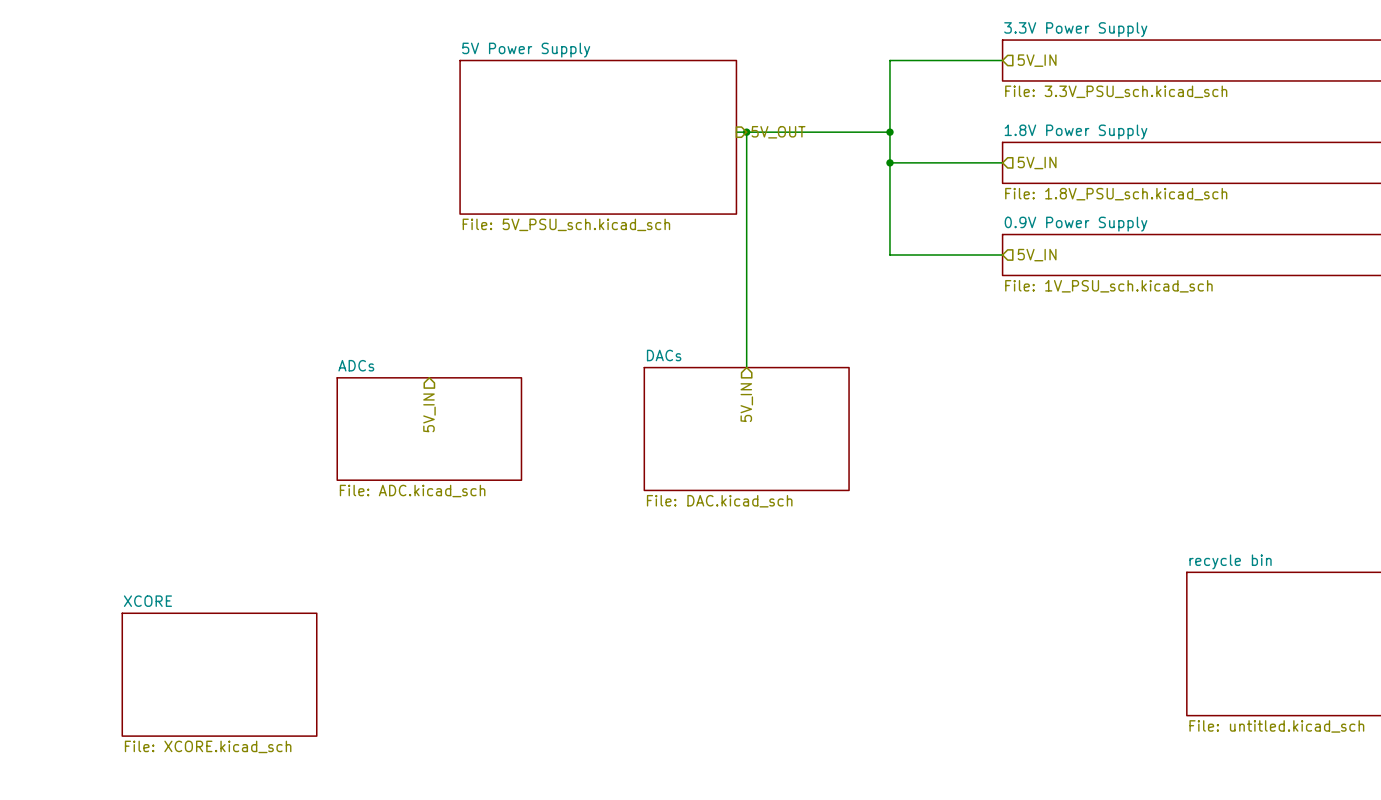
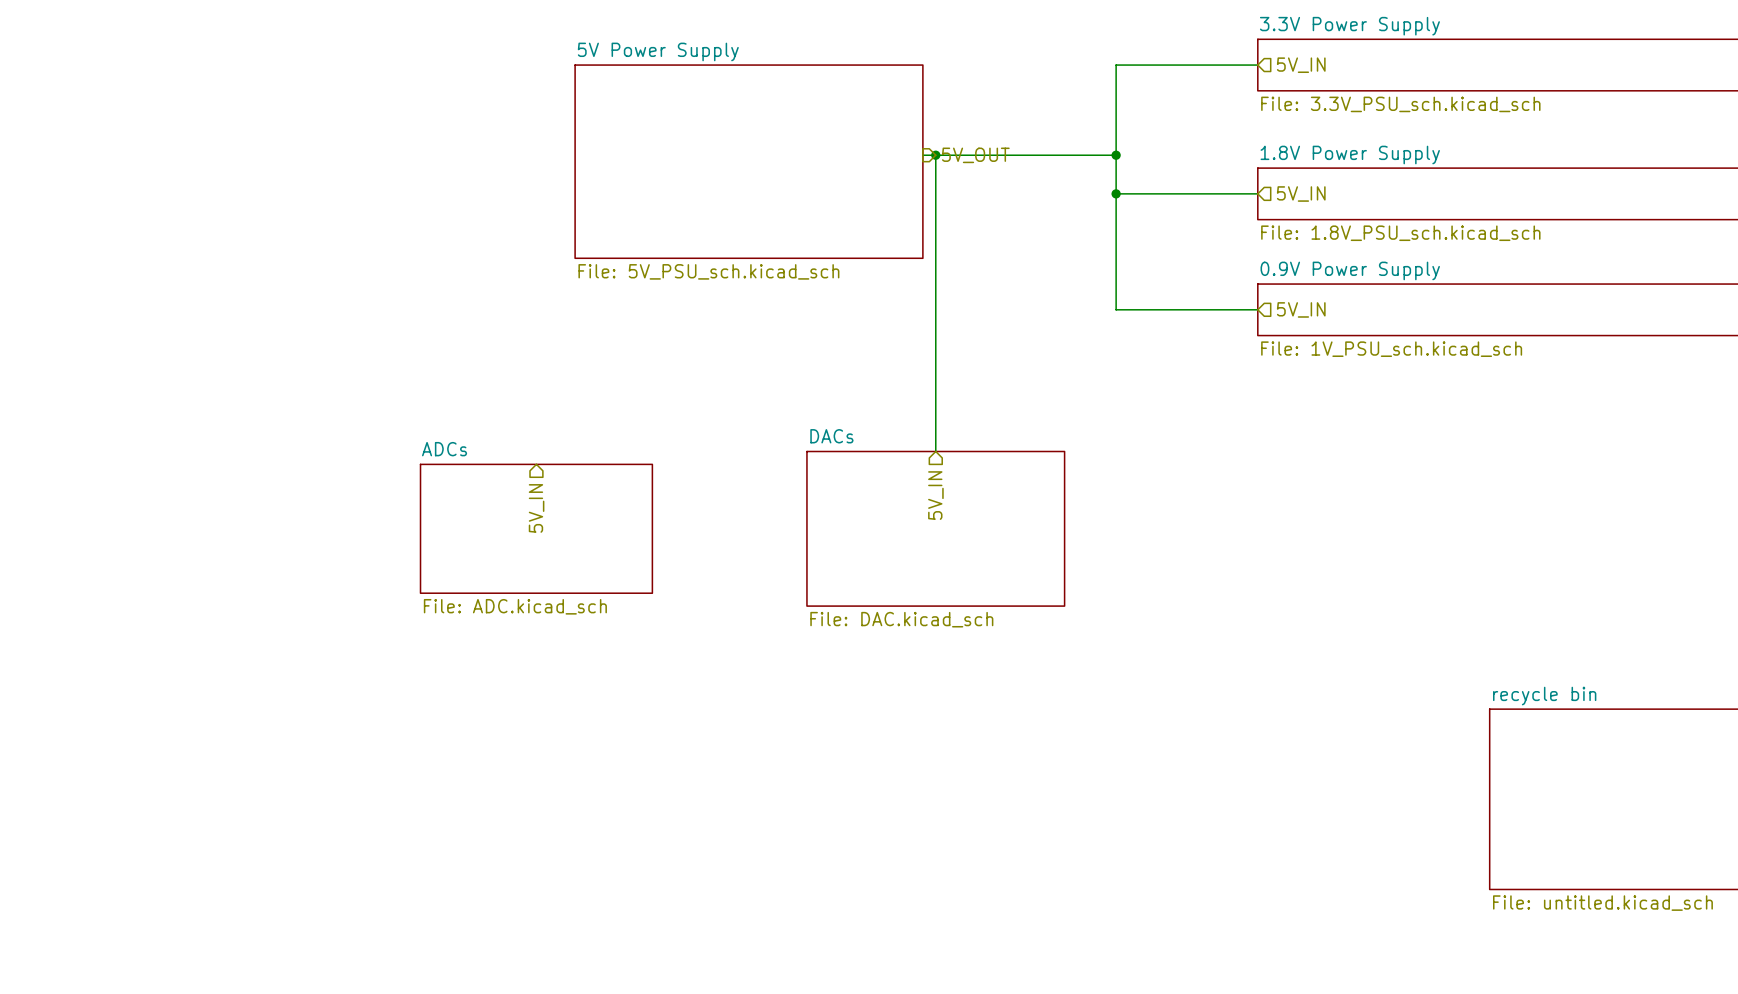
sheet XCORE: File: XCORE.kicad_sch (219, 674) -> none

